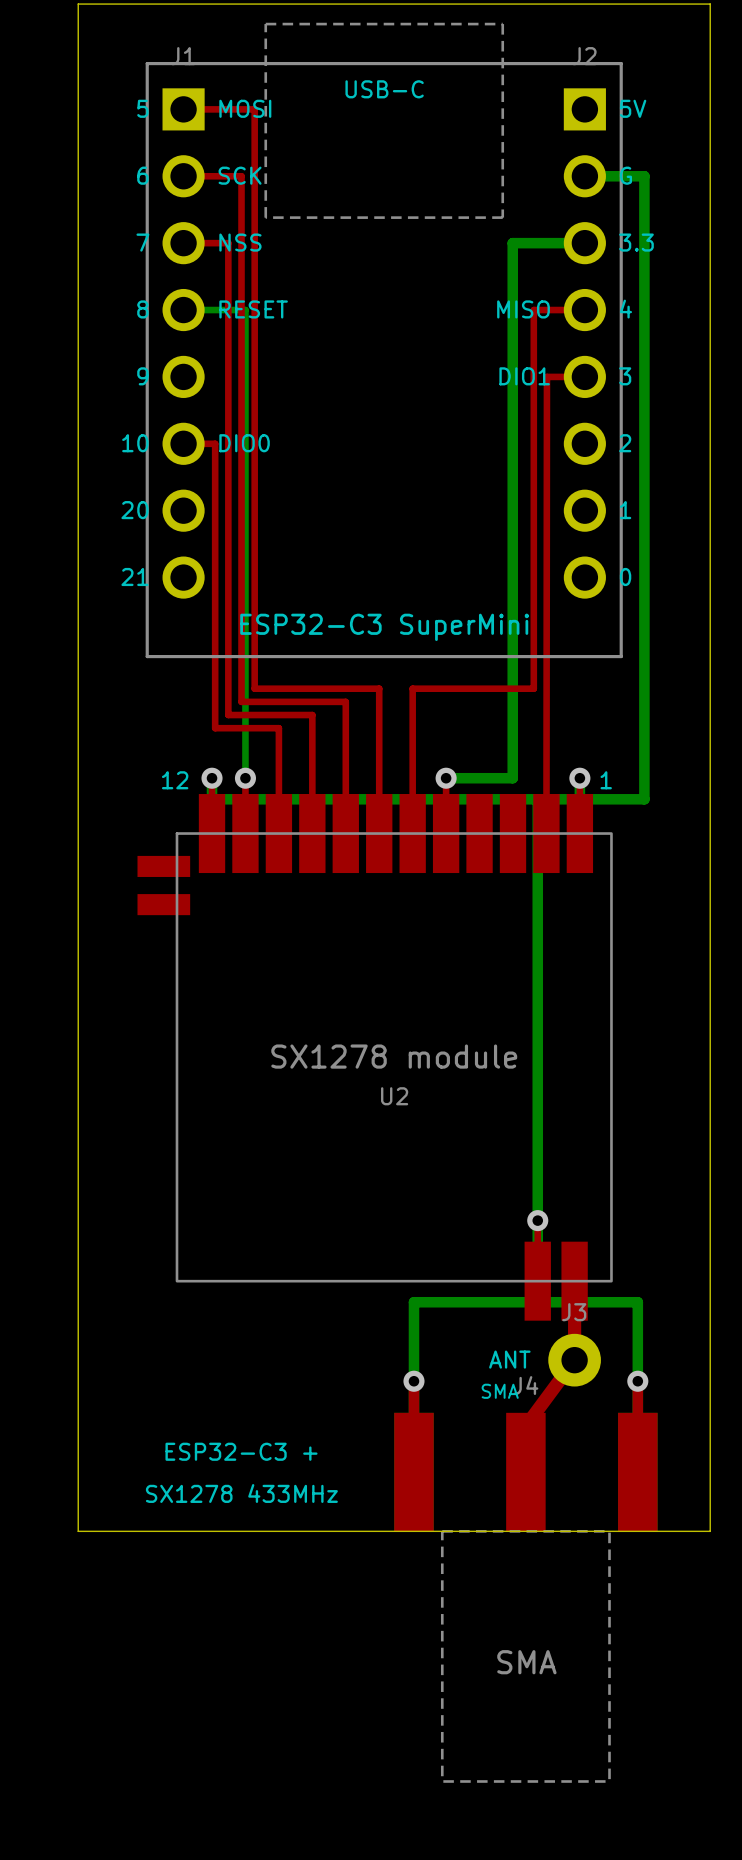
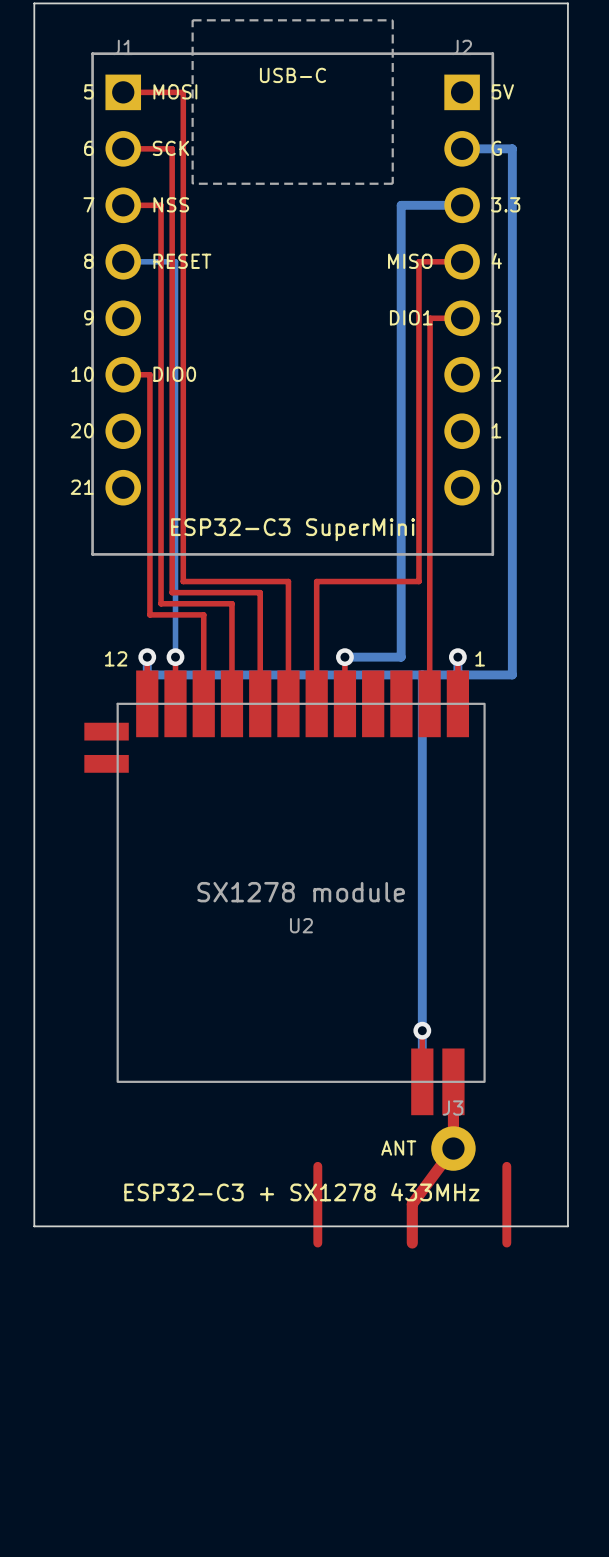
via: (413, 1381) -> none
via: (637, 1381) -> none
text: SMA (500, 1391) -> none
text: none -> ESP32-C3 + SX1278 433MHz (301, 1192)
text: ESP32-C3 + (241, 1451) -> none
board edge: (78, 1452) (78, 1531) (710, 1531) (710, 1452) -> (34, 1226) (567, 1226)
bottom track: (413, 1472) (413, 1302) (637, 1302) (637, 1472) -> none
text: SX1278 433MHz (241, 1493) -> none
J4: (525, 1597) -> none

